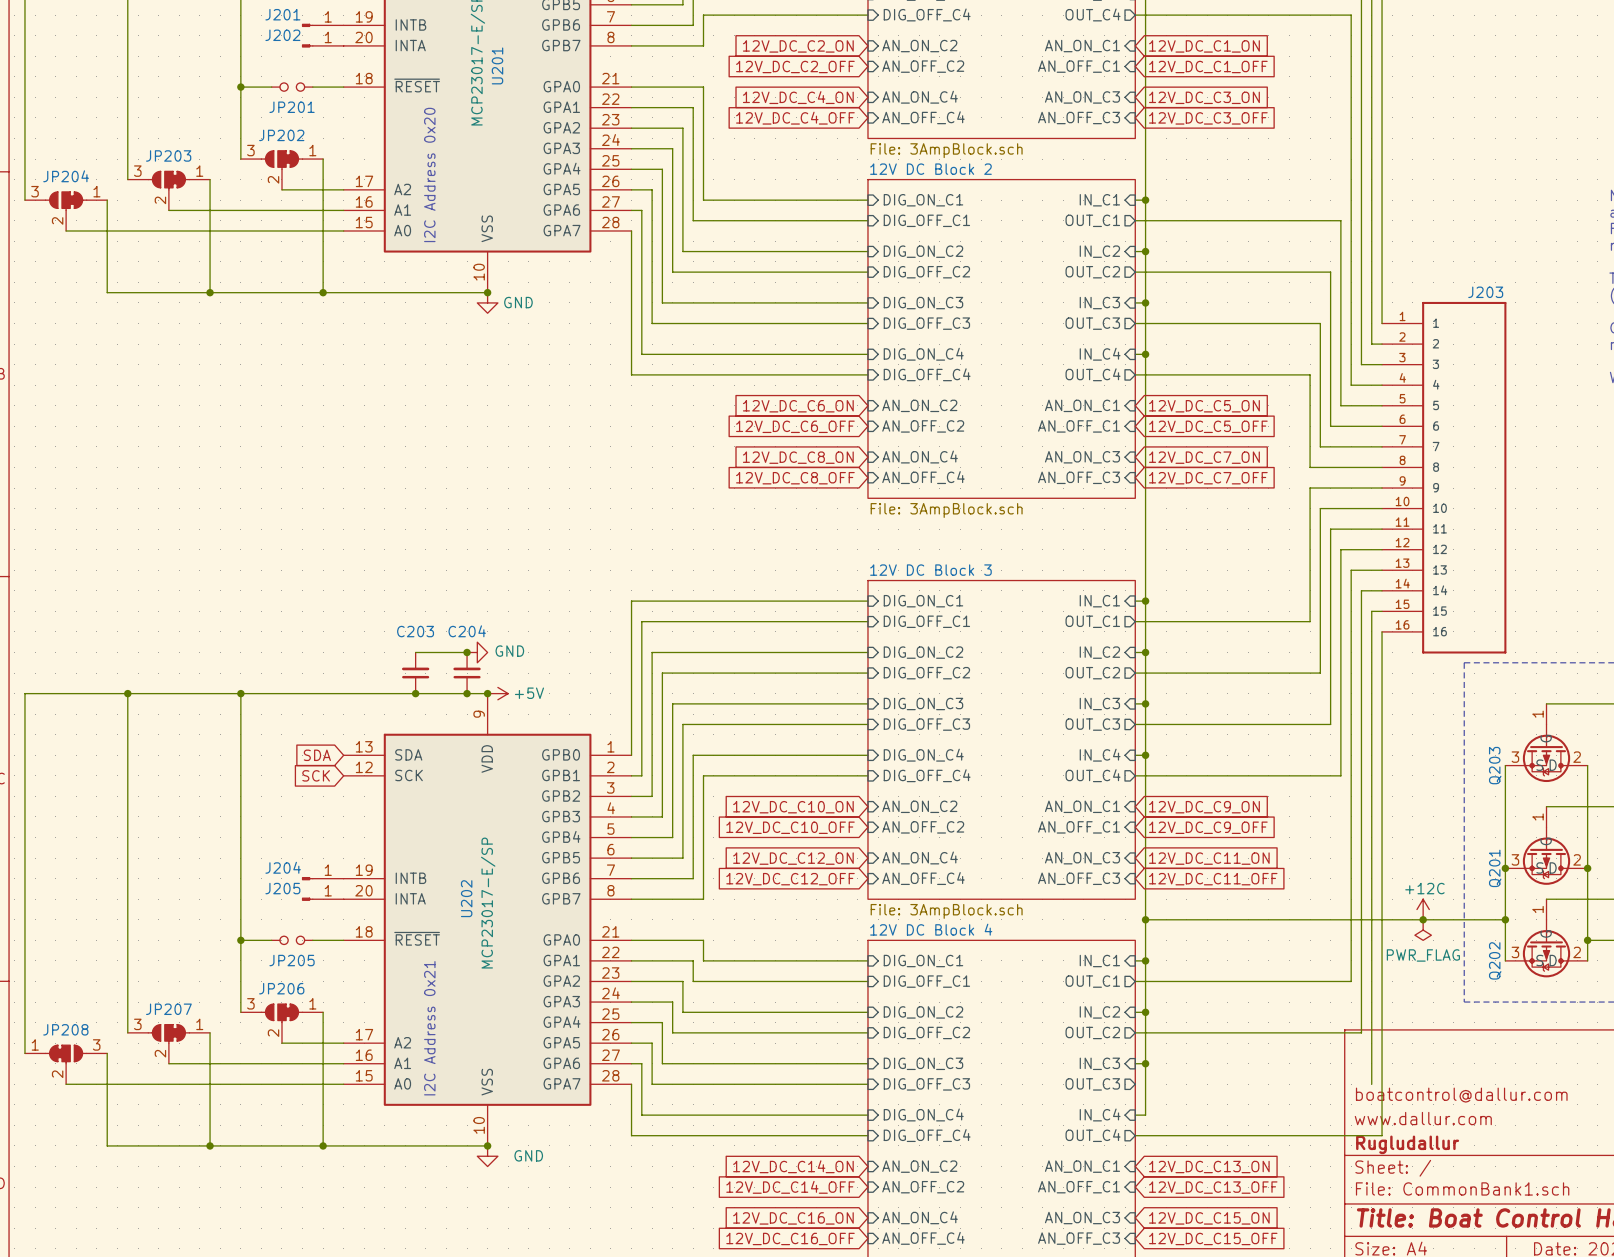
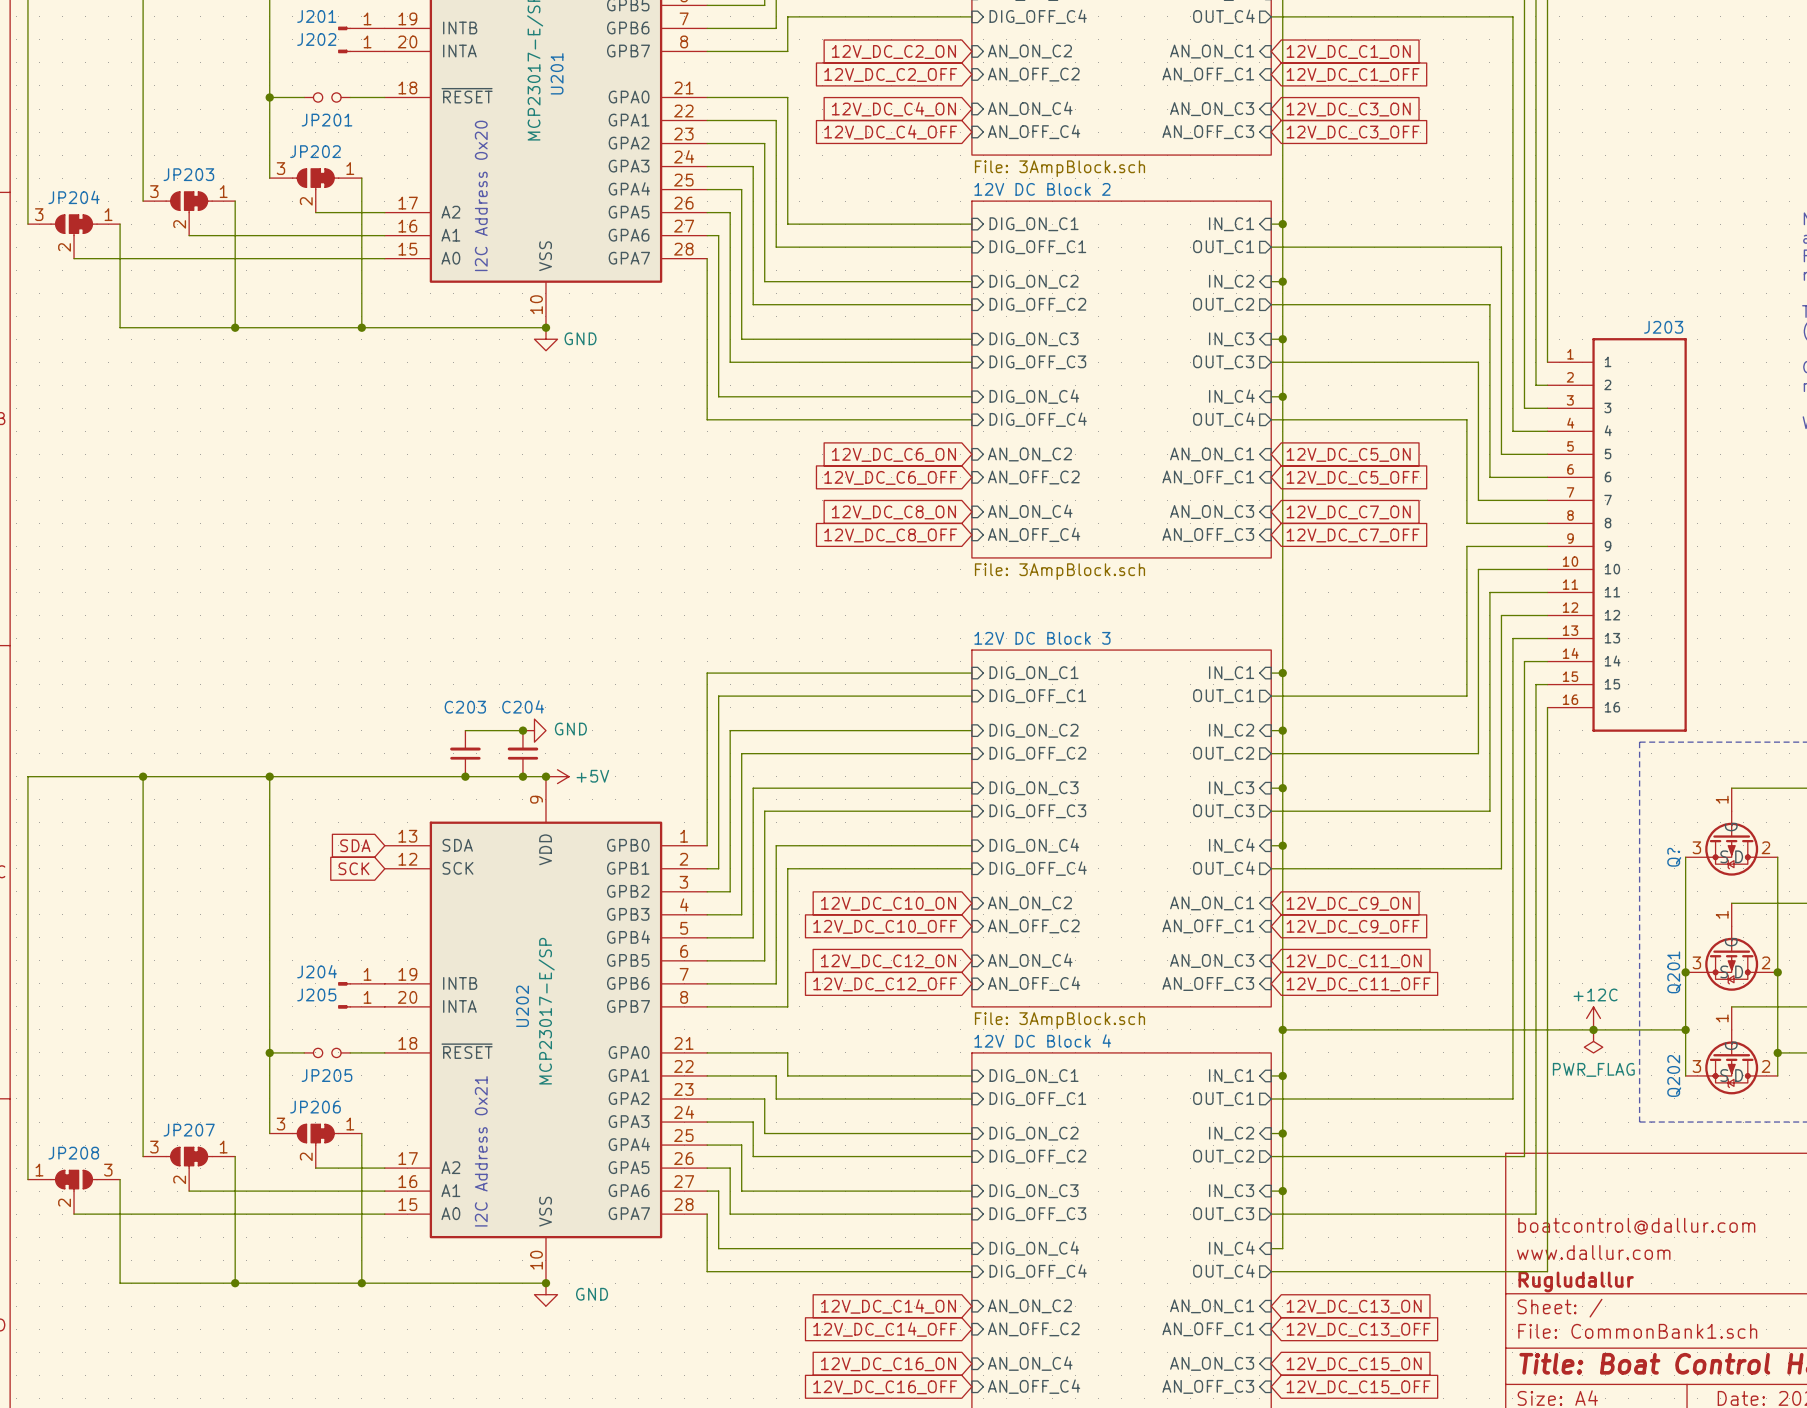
Q203 name: Q203 (1495, 765) -> Q? (1674, 857)
wire: none -> (1271, 1214) (1535, 1214)

